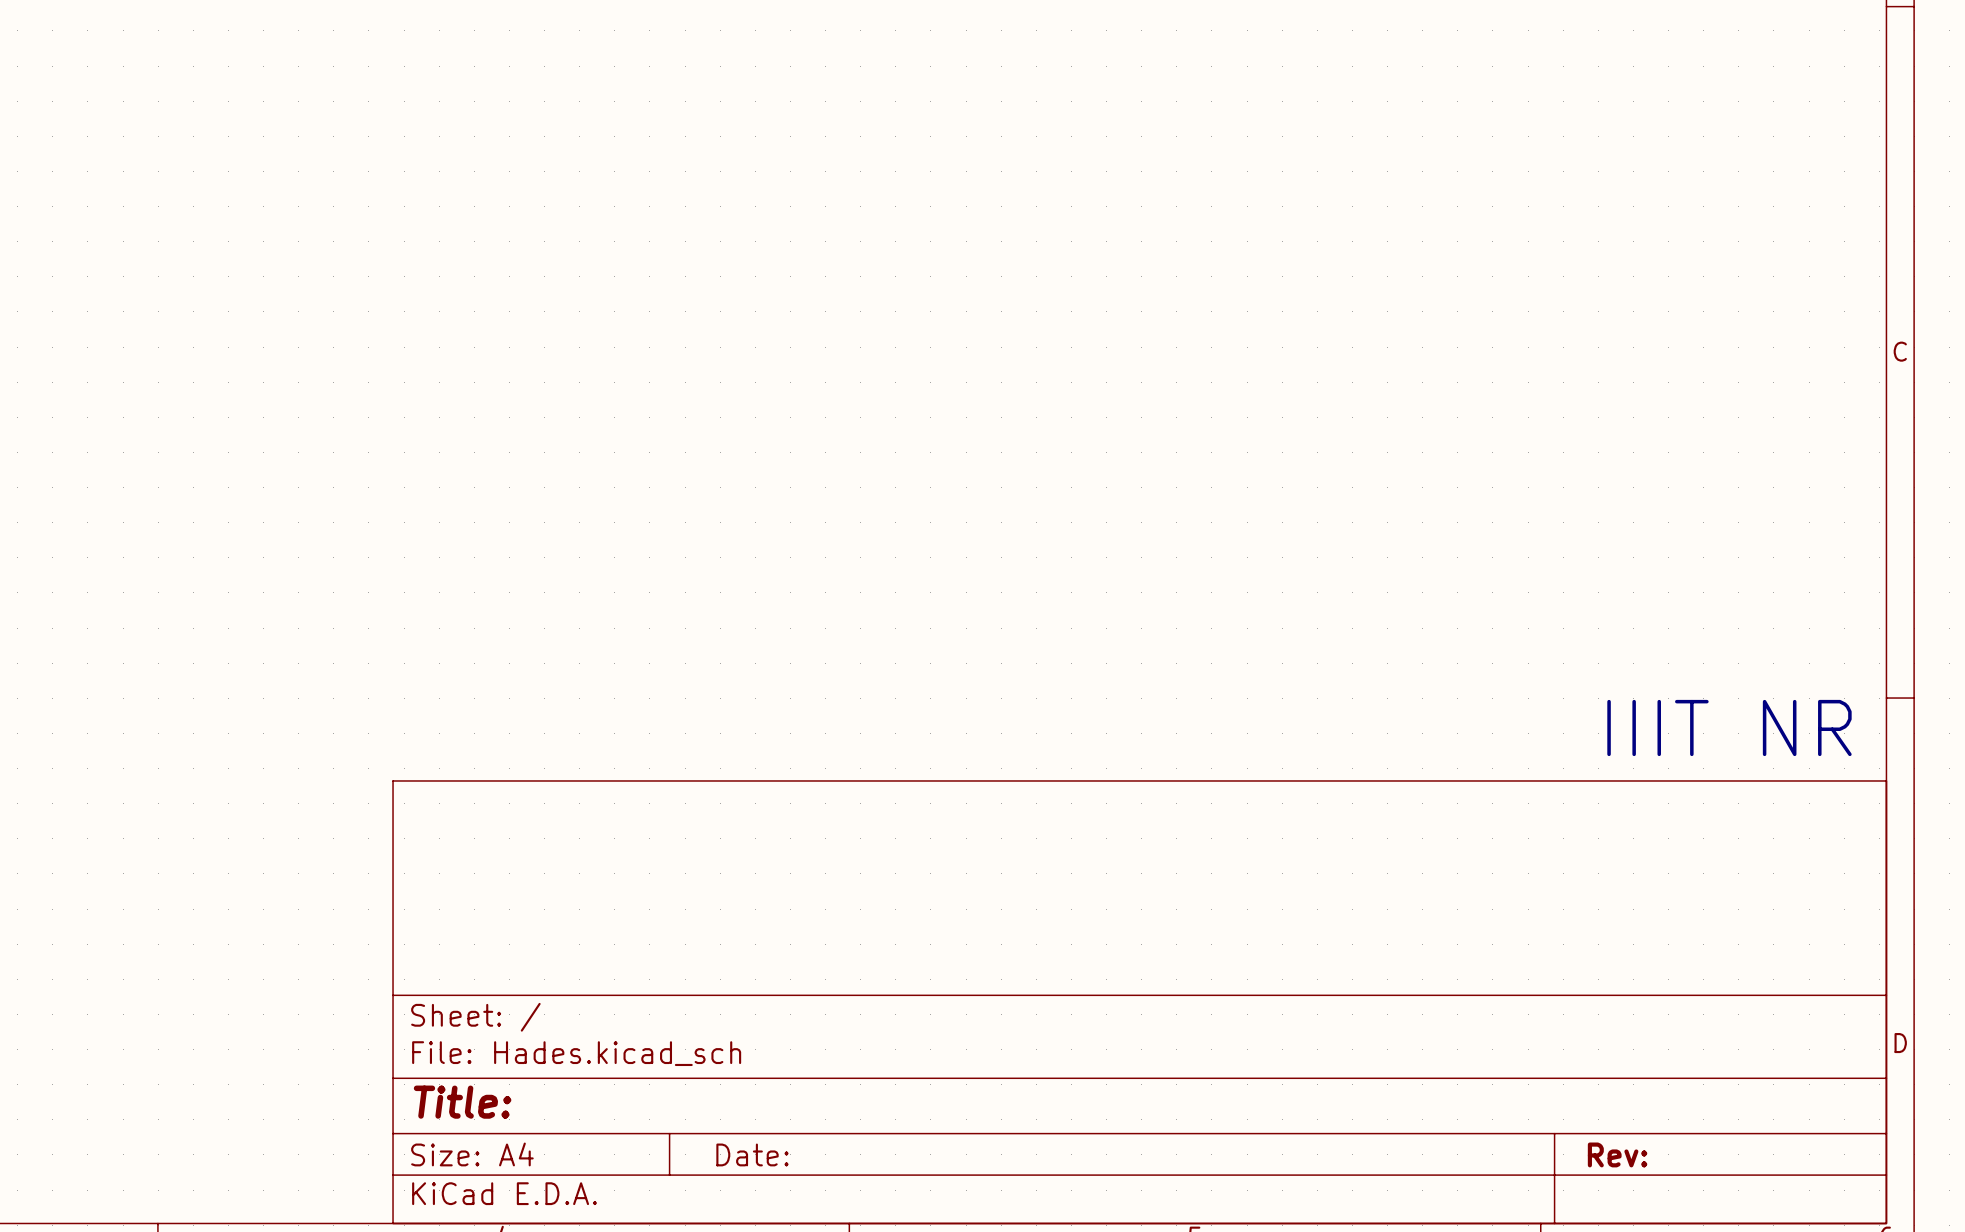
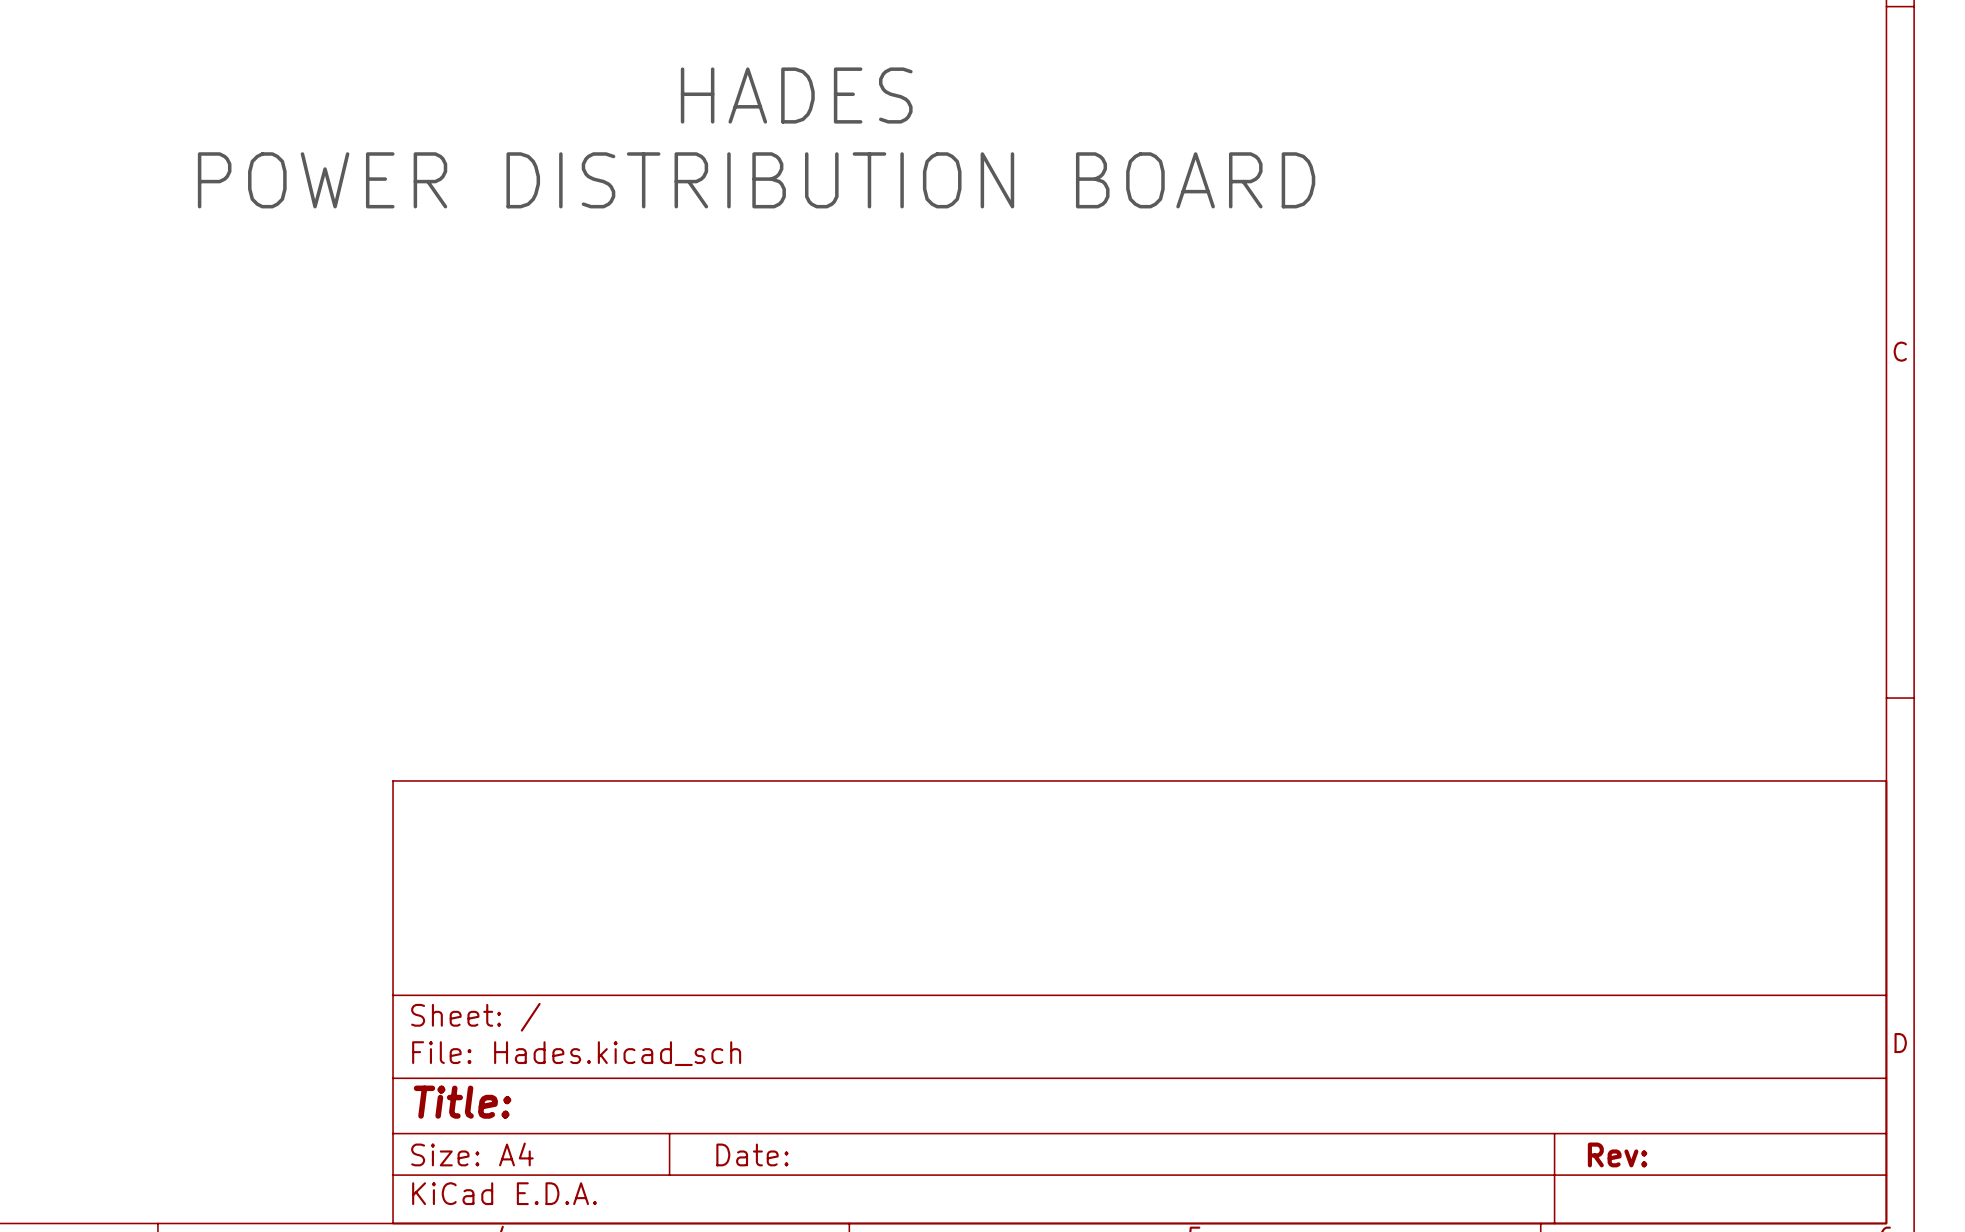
text: none -> HADES (796, 95)
text: none -> POWER DISTRIBUTION BOARD (756, 180)
text: IIIT NR (1729, 727) -> none

